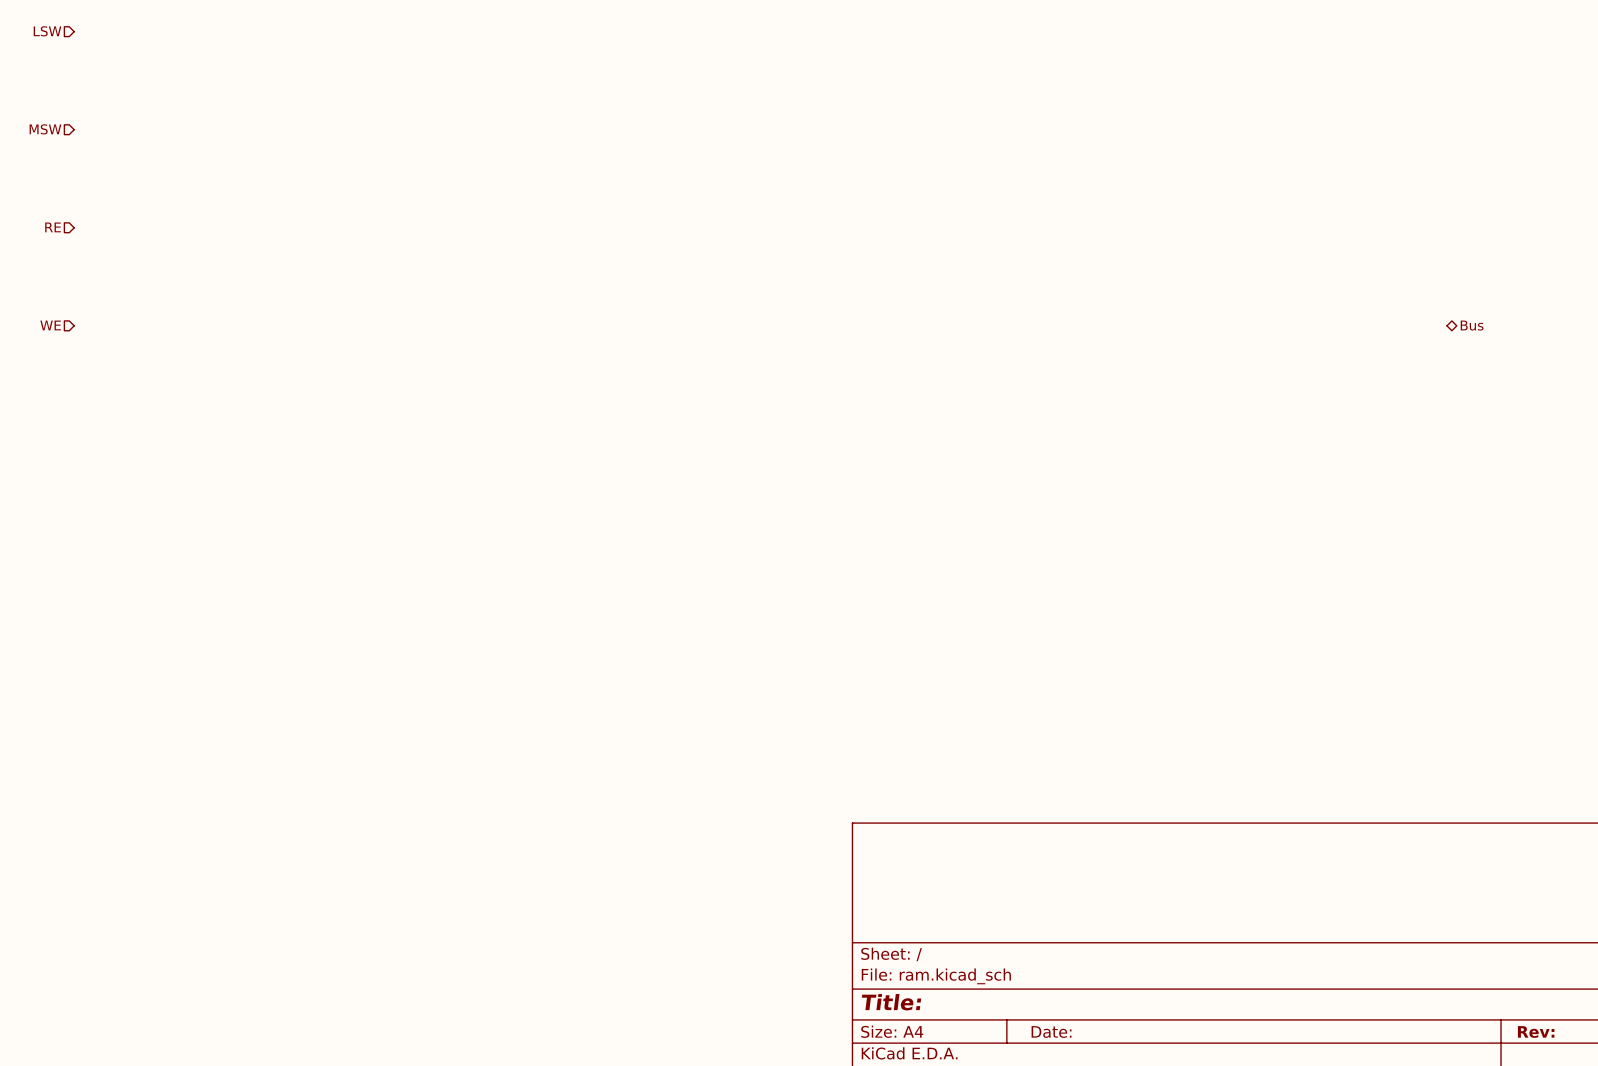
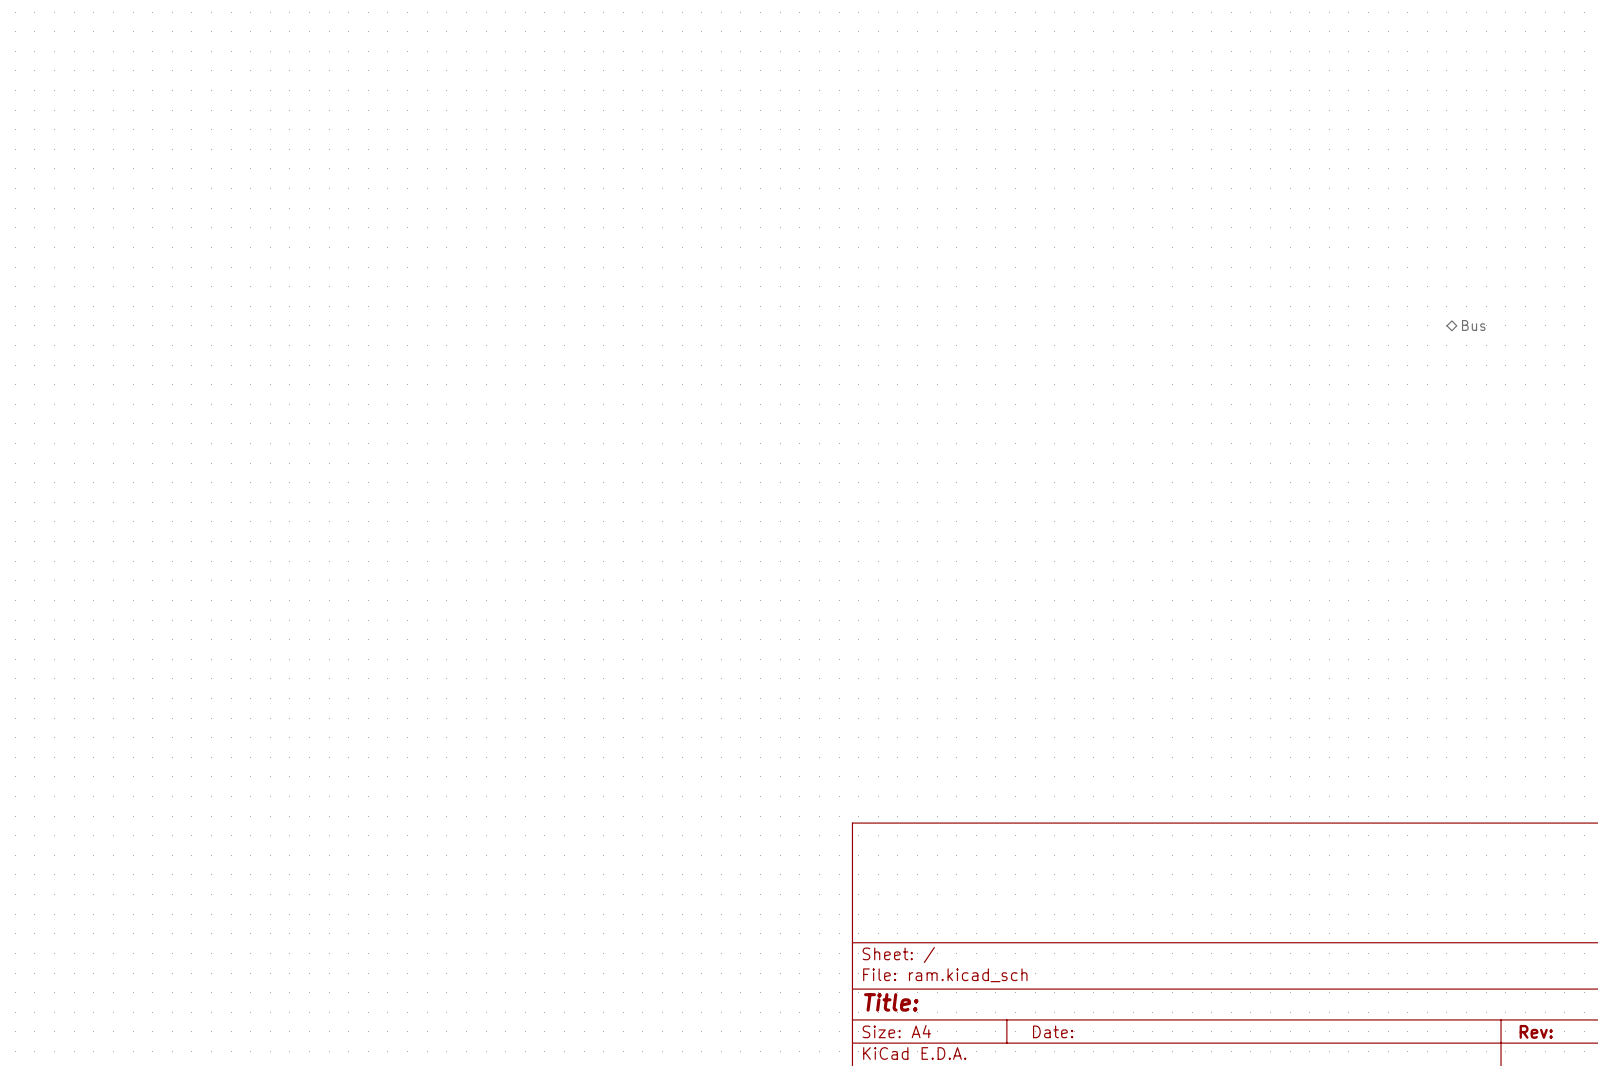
hierarchical label: LSW (47, 31) -> none
hierarchical label: MSW (45, 129) -> none
hierarchical label: RE (53, 227) -> none
hierarchical label: WE (50, 325) -> none

